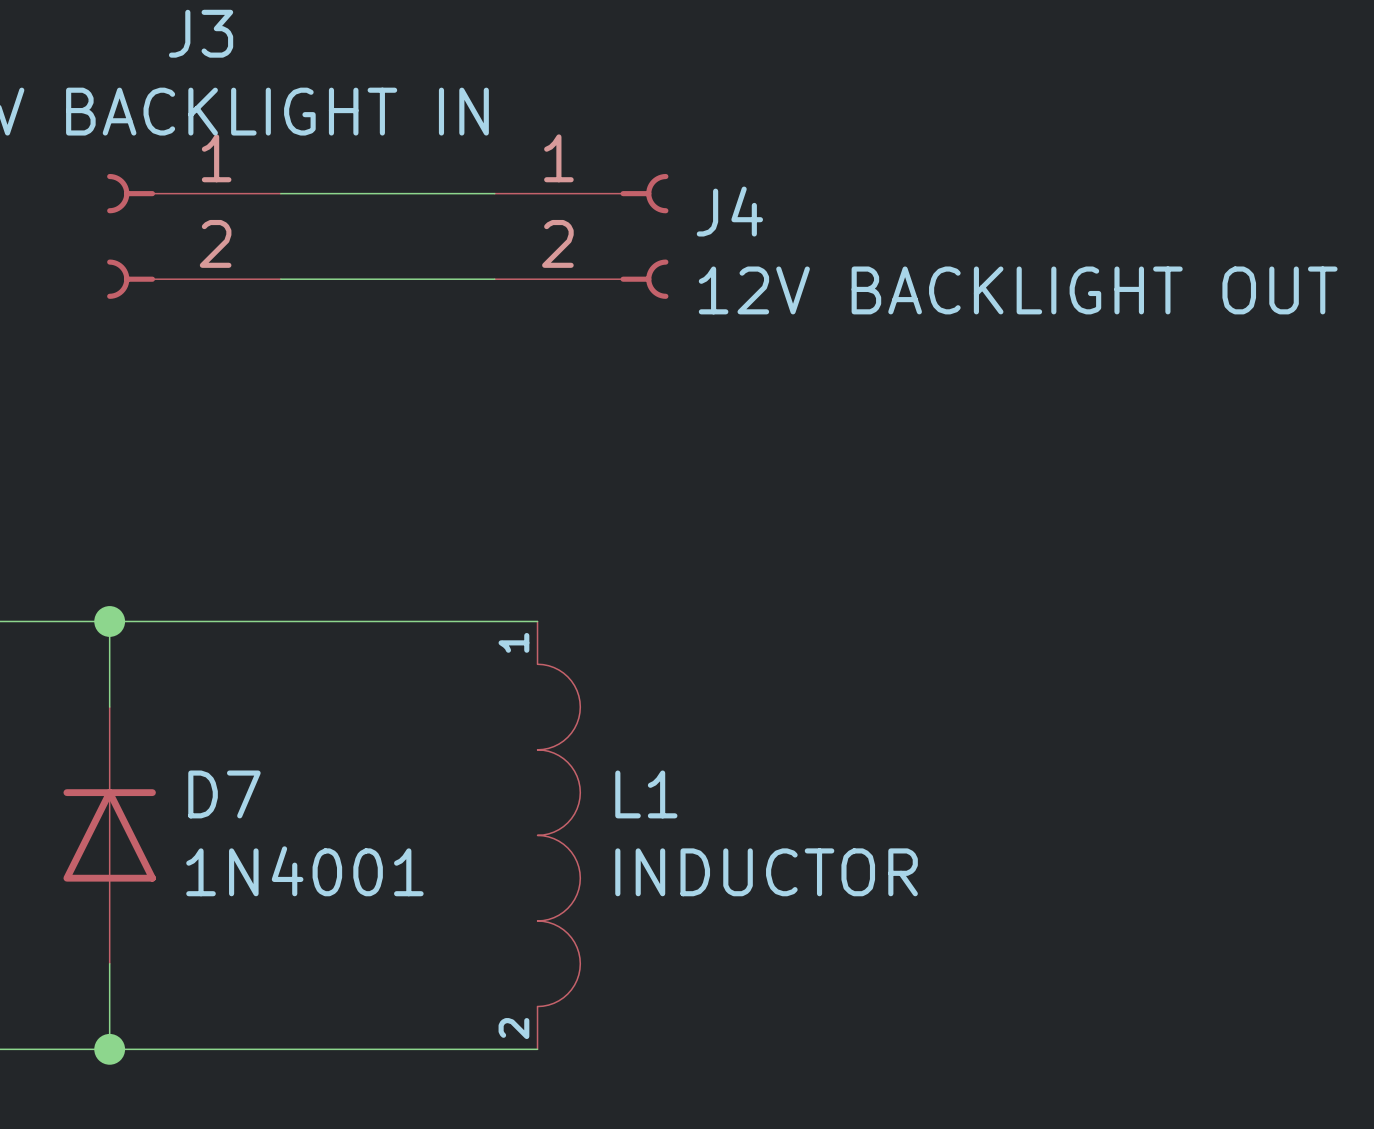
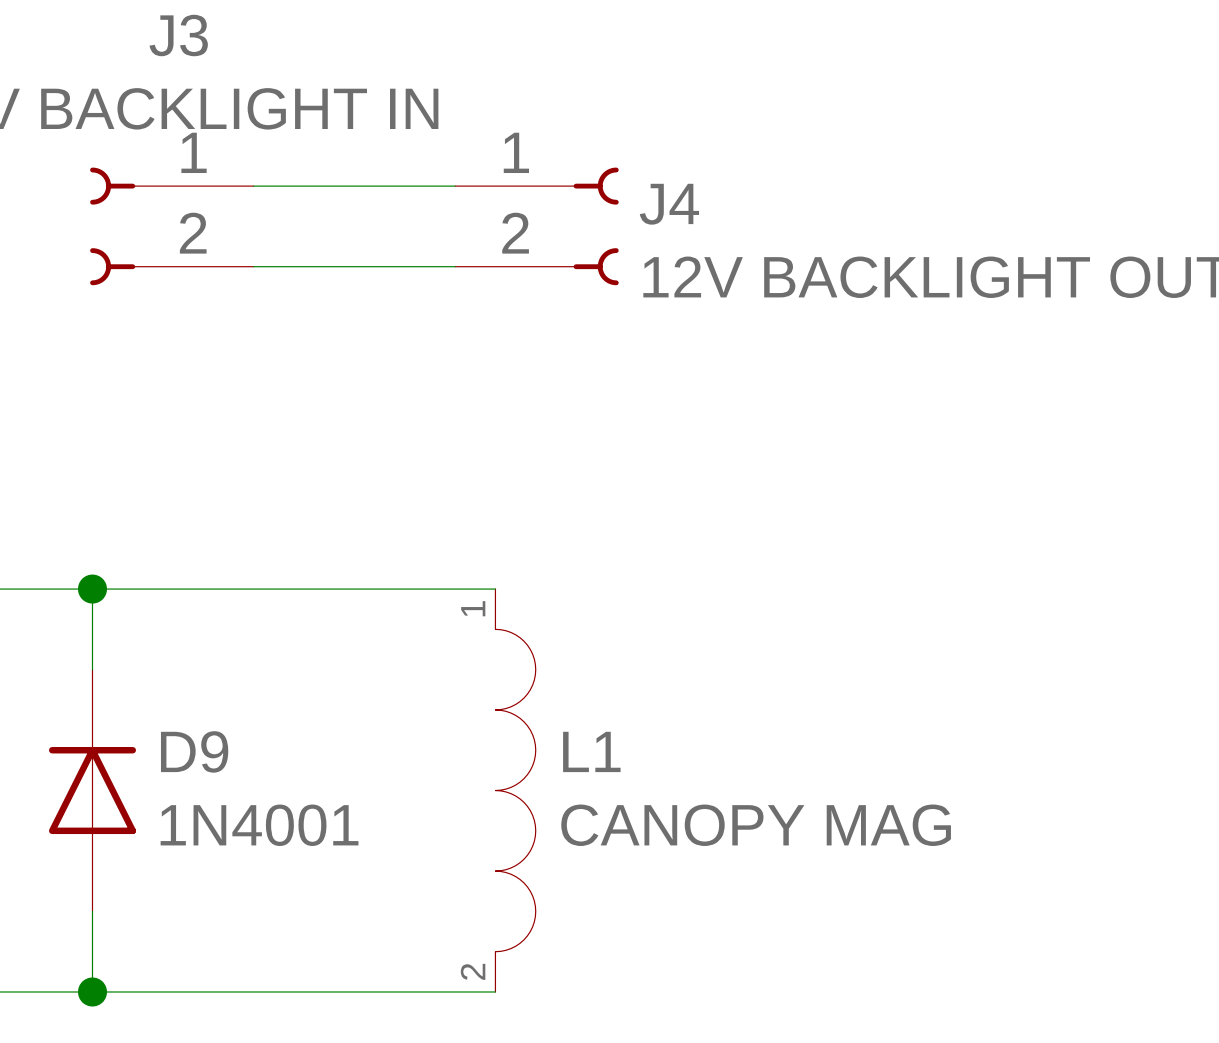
D7 name: D7 (224, 794) -> D9 (194, 751)
L1 value: INDUCTOR (766, 872) -> CANOPY MAG (756, 825)

